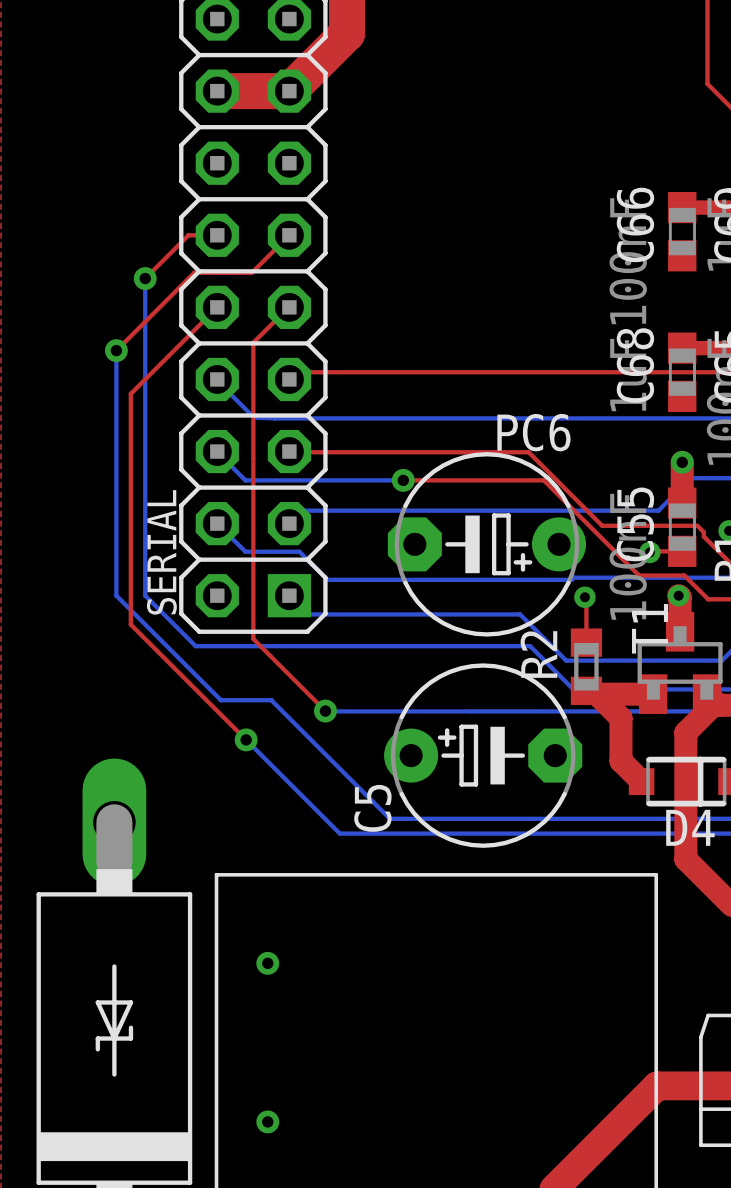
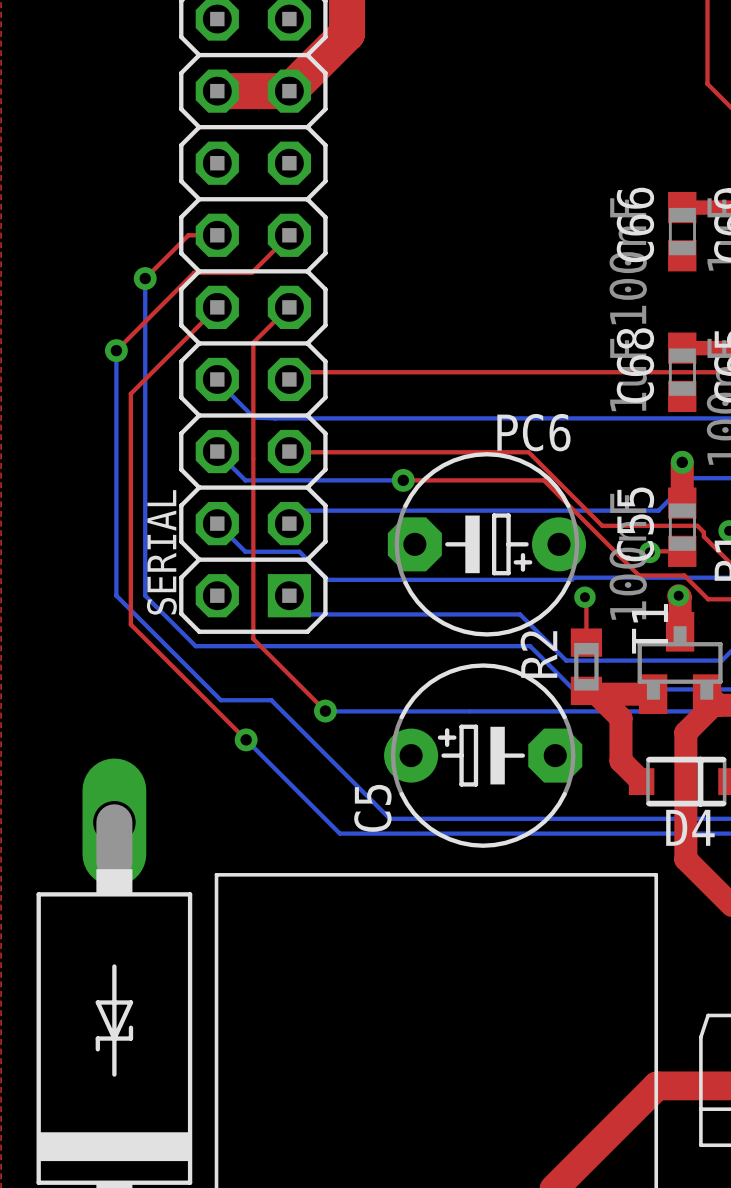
via: (267, 963) -> none
via: (267, 1121) -> none

